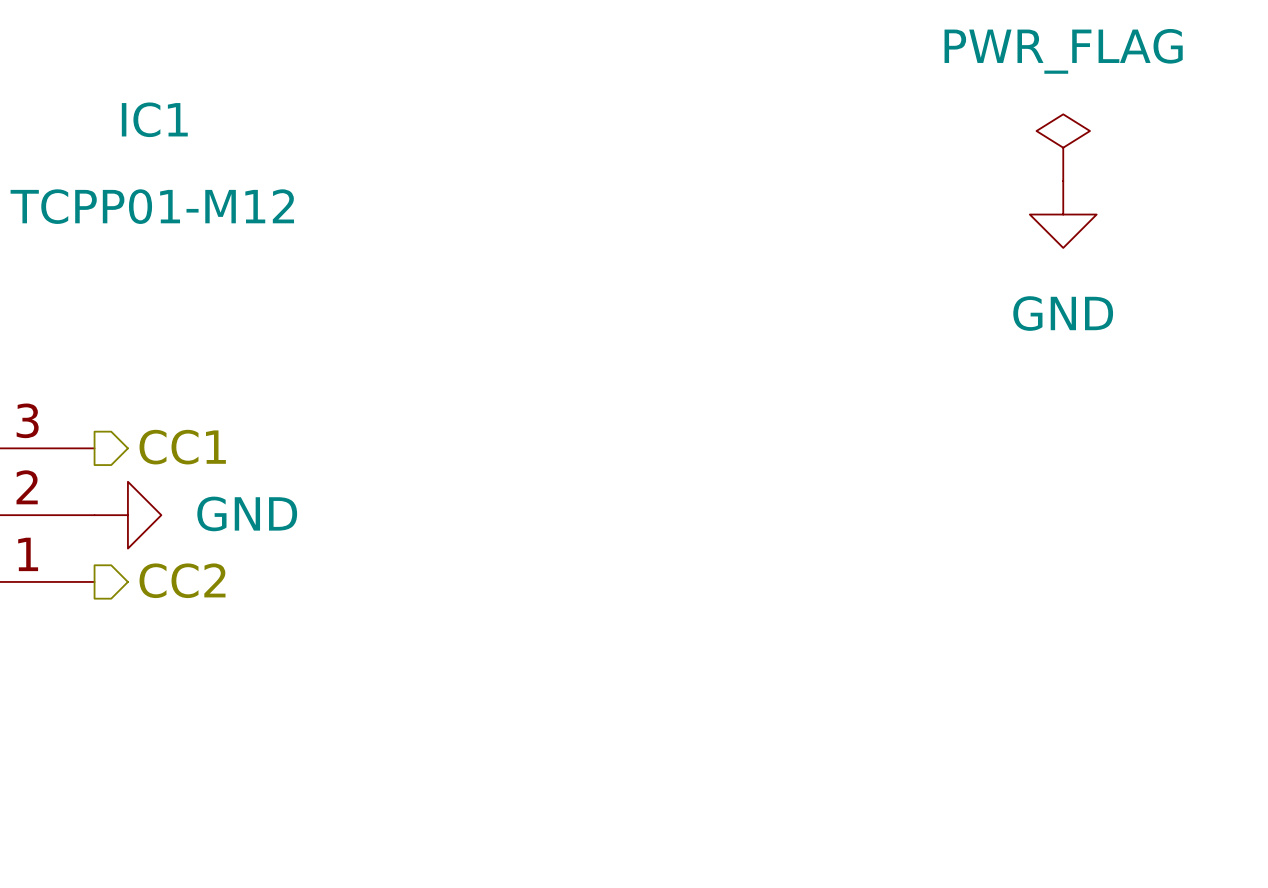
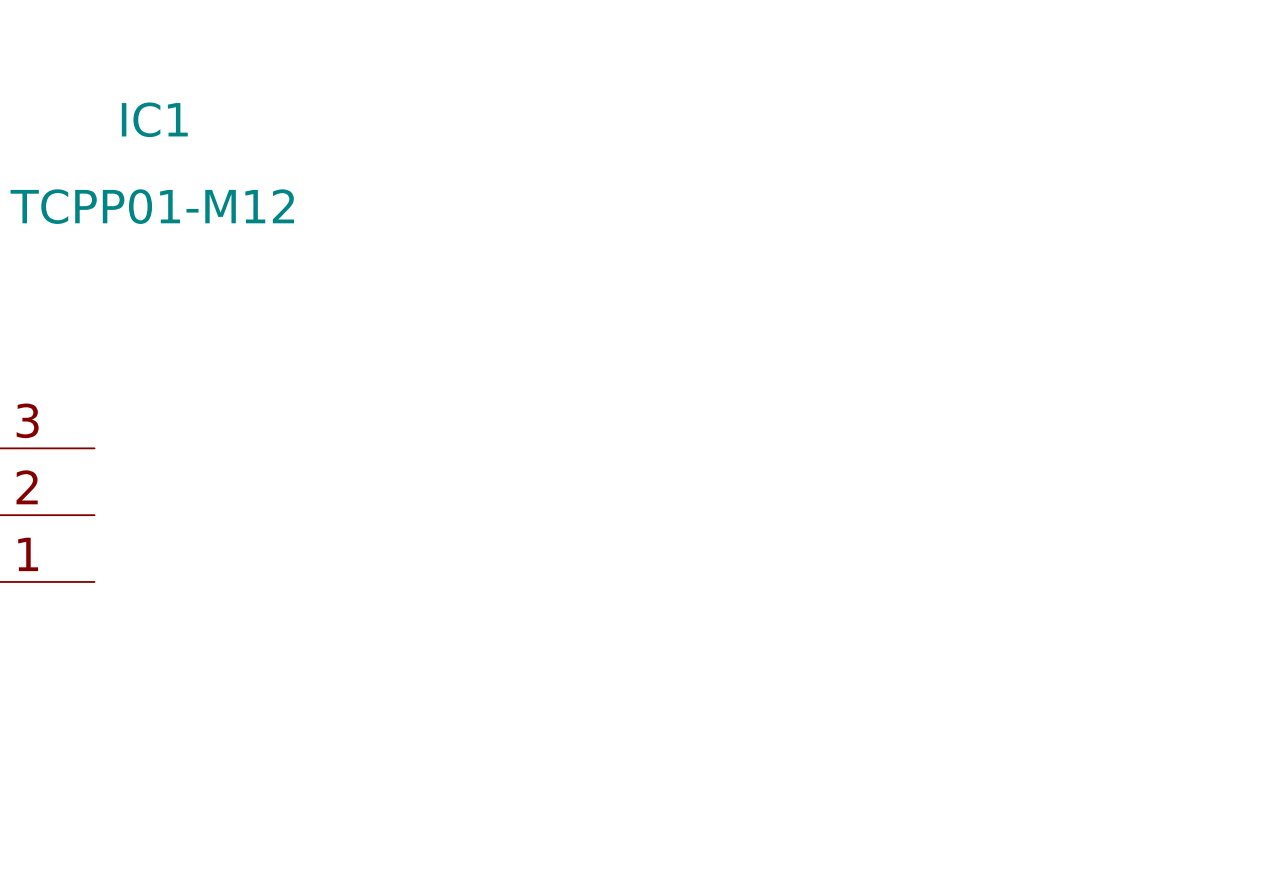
power symbol: PWR_FLAG (1063, 147) -> none
power symbol: GND (1063, 214) -> none
hierarchical label: CC1 (182, 447) -> none
power symbol: GND (127, 515) -> none
hierarchical label: CC2 (182, 580) -> none

